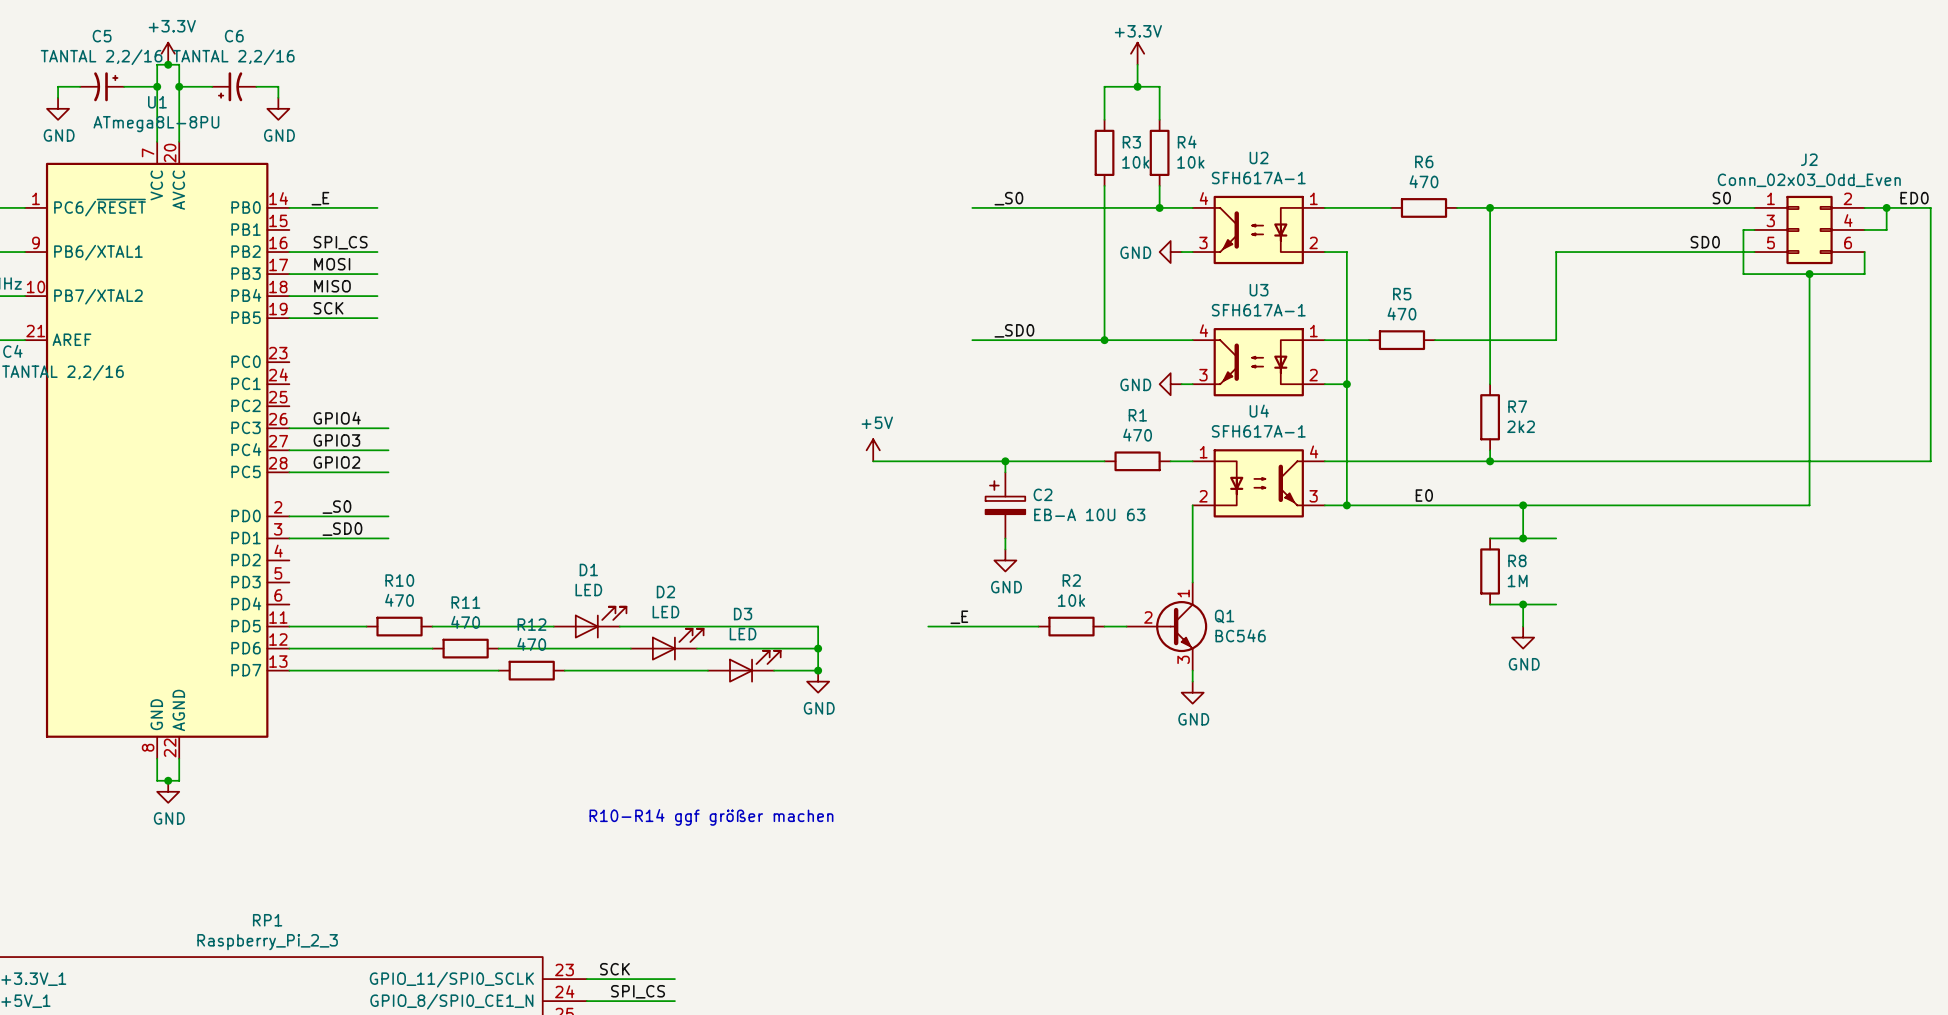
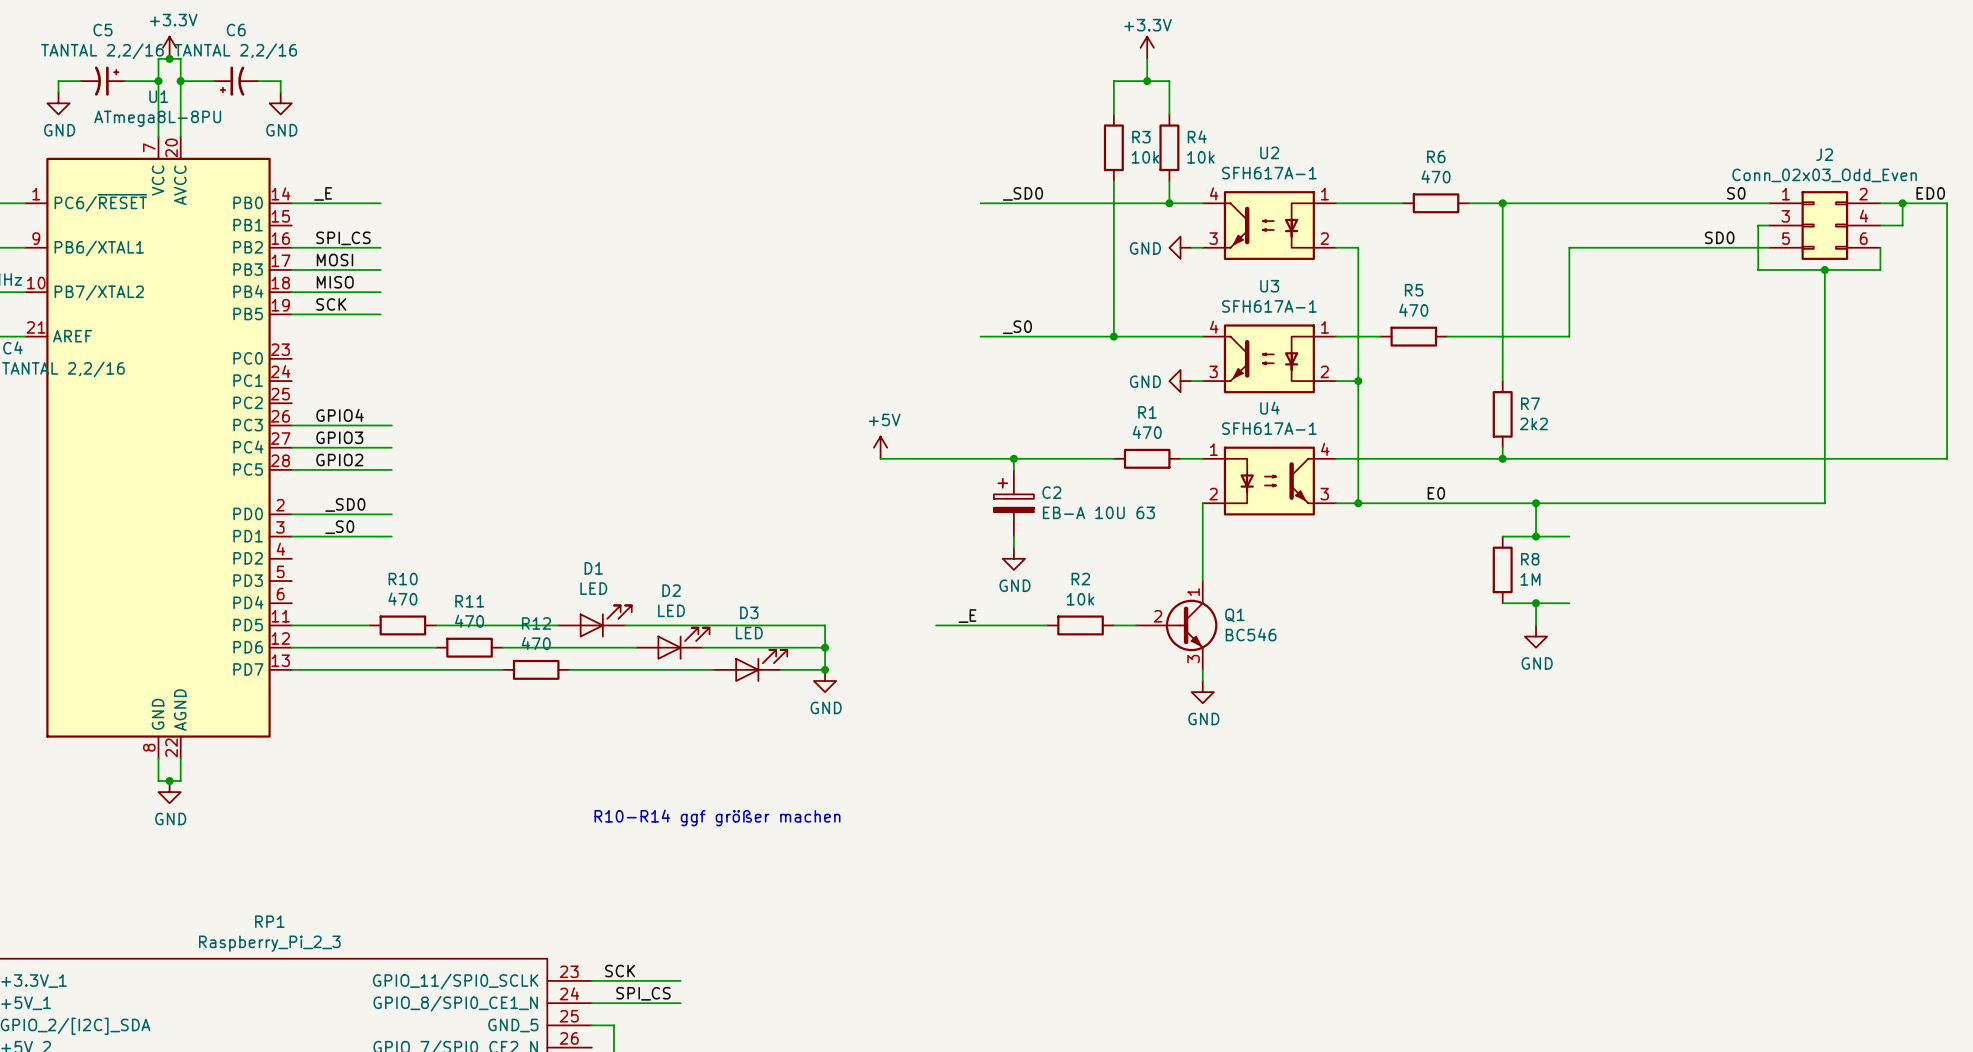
label: _S0 (1008, 198) -> _SD0 (1022, 193)
label: _SD0 (1014, 330) -> _S0 (1017, 327)
label: _S0 (336, 507) -> _SD0 (345, 504)
label: _SD0 (342, 529) -> _S0 (339, 527)

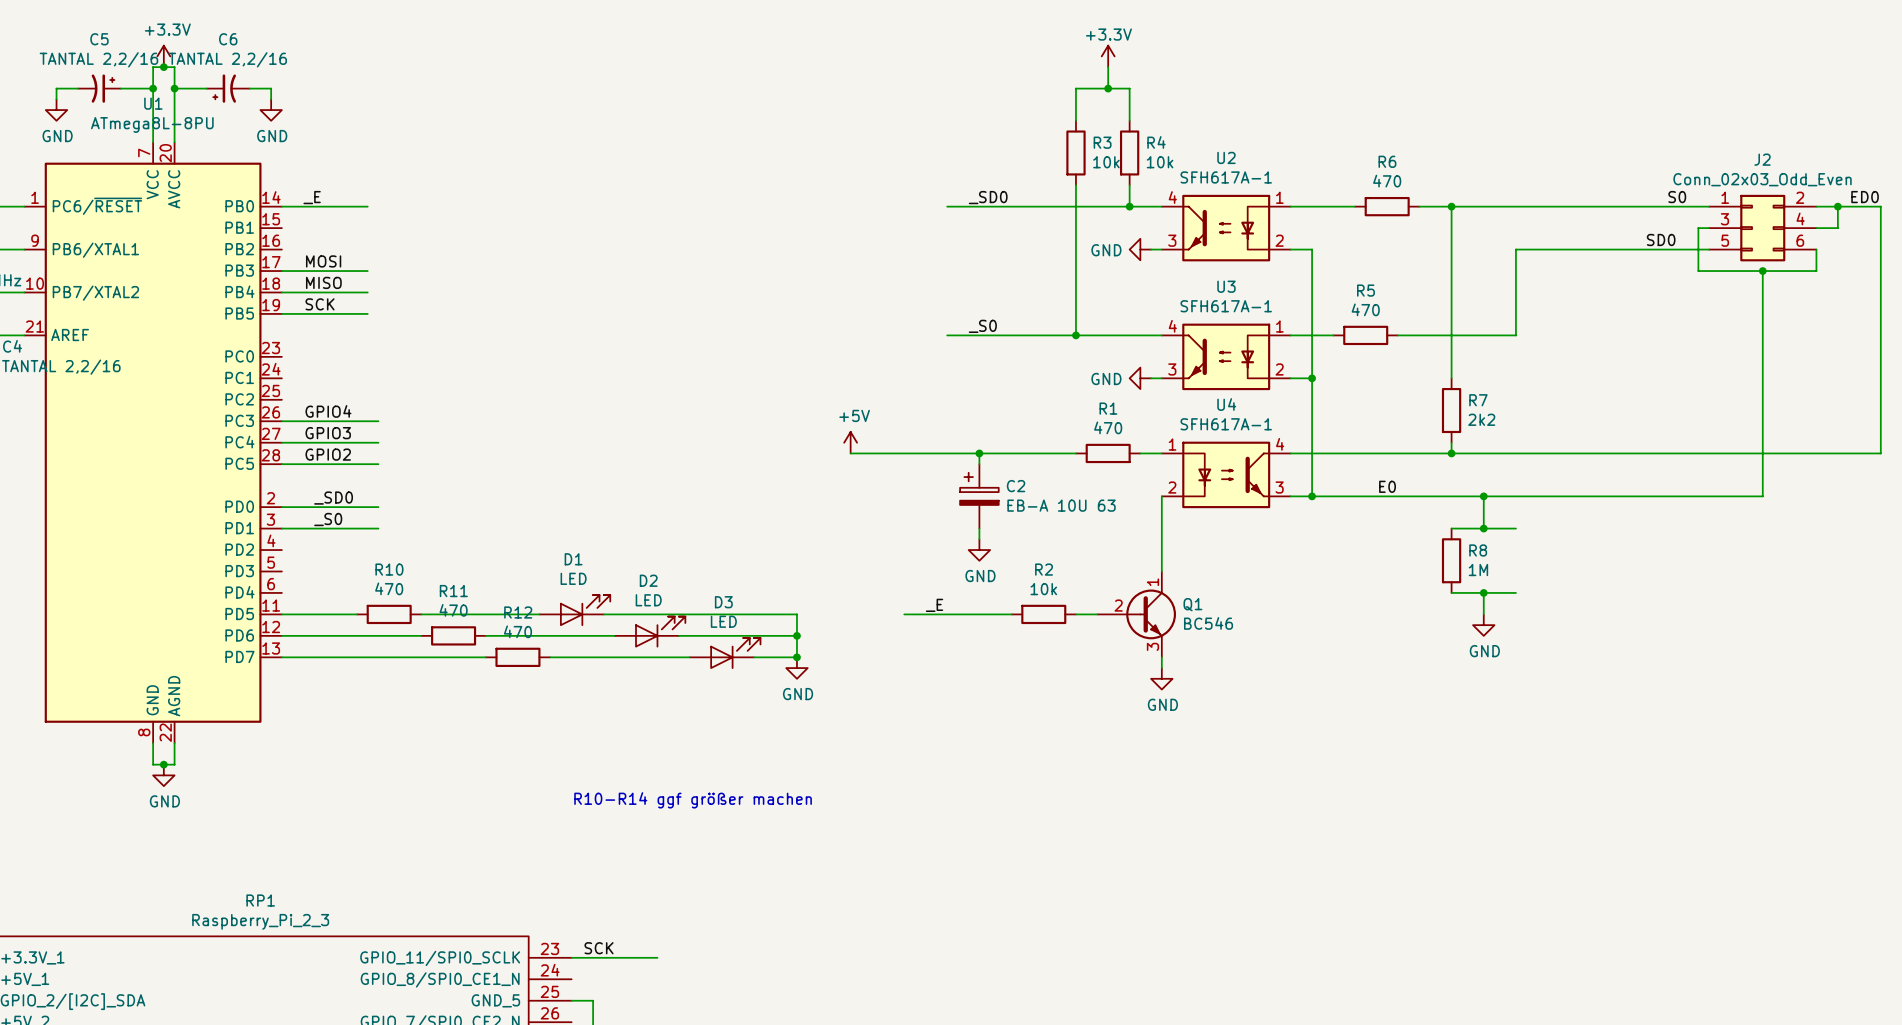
label: SPI_CS (343, 238) -> none
wire: (291, 247) (380, 247) -> none
label: SPI_CS (643, 993) -> none
wire: (591, 1003) (680, 1003) -> none

